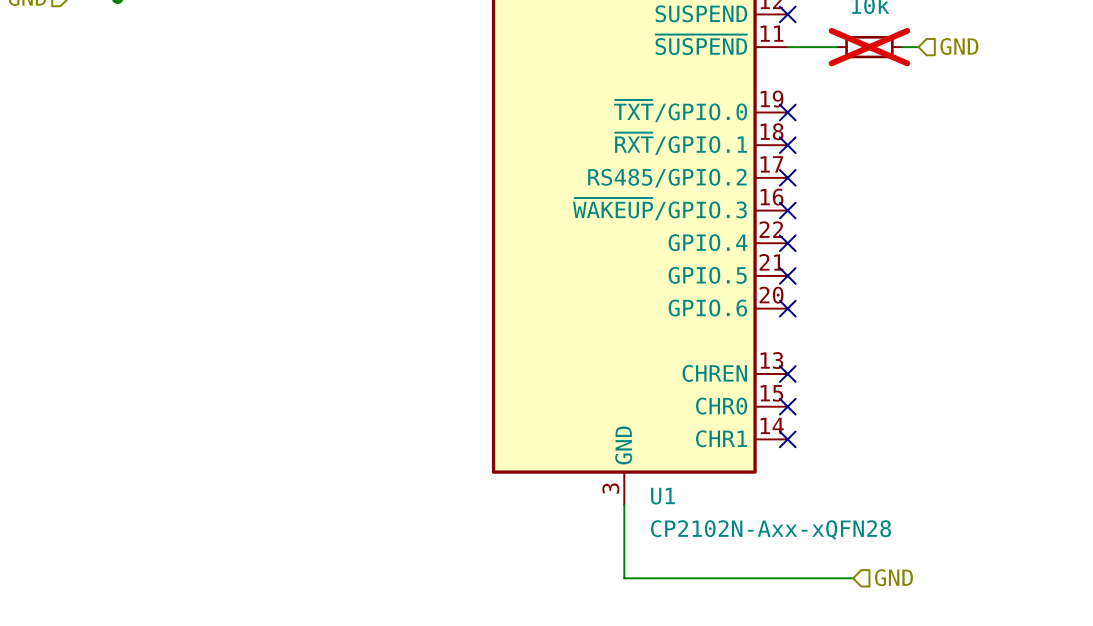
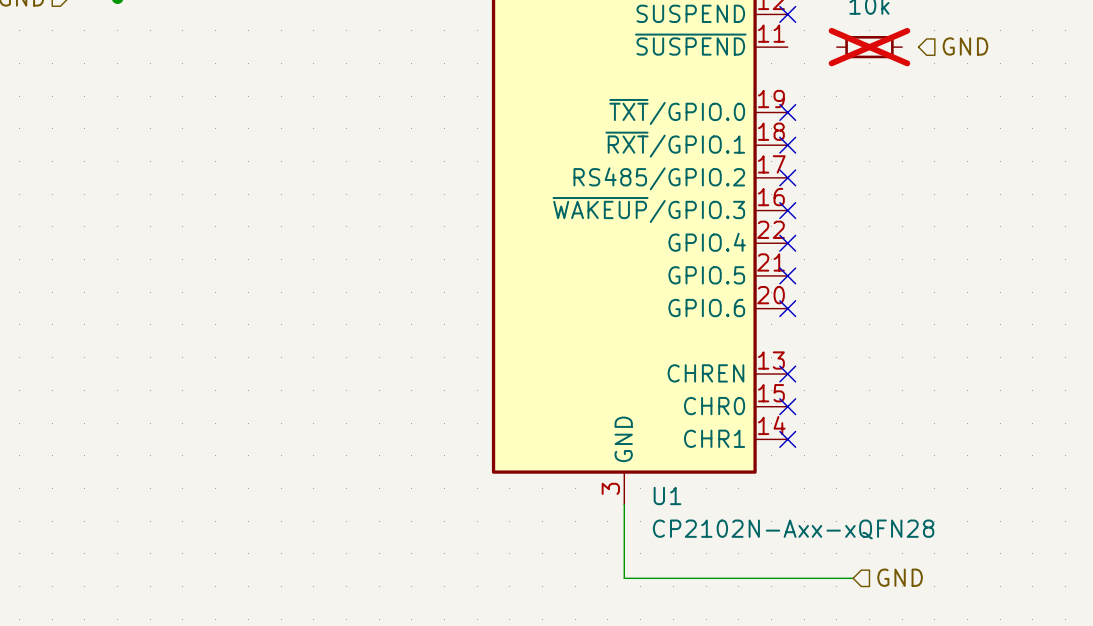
wire: (787, 47) (836, 47) -> none
wire: (902, 47) (918, 47) -> none

